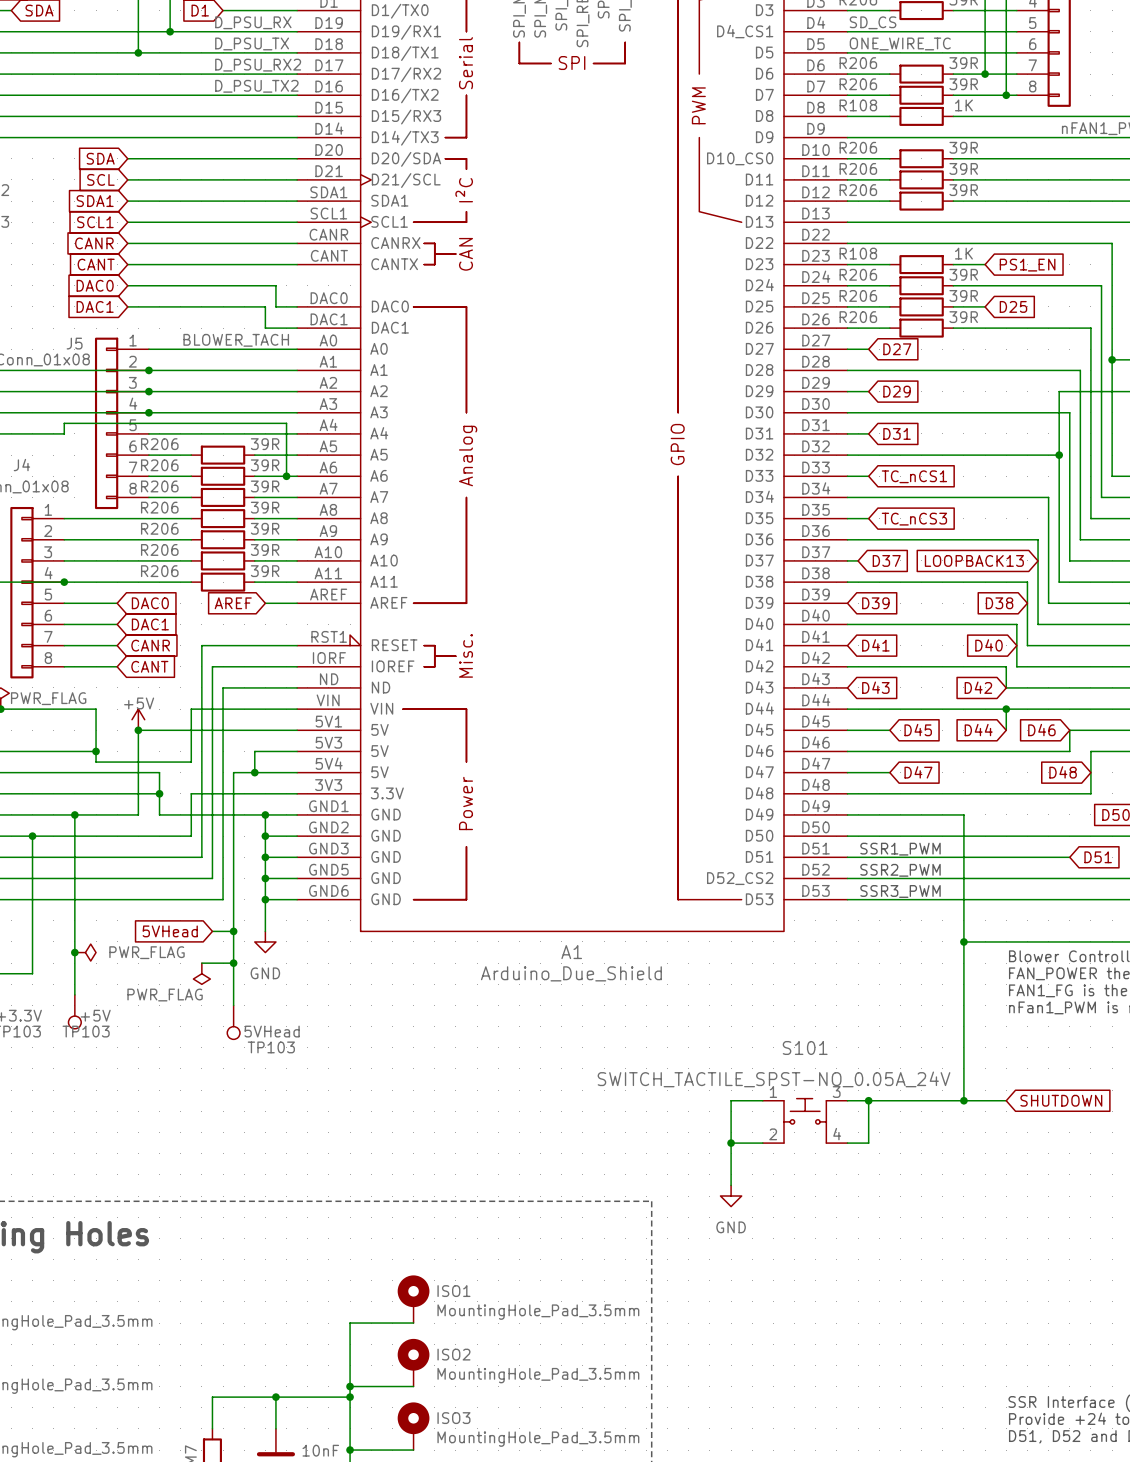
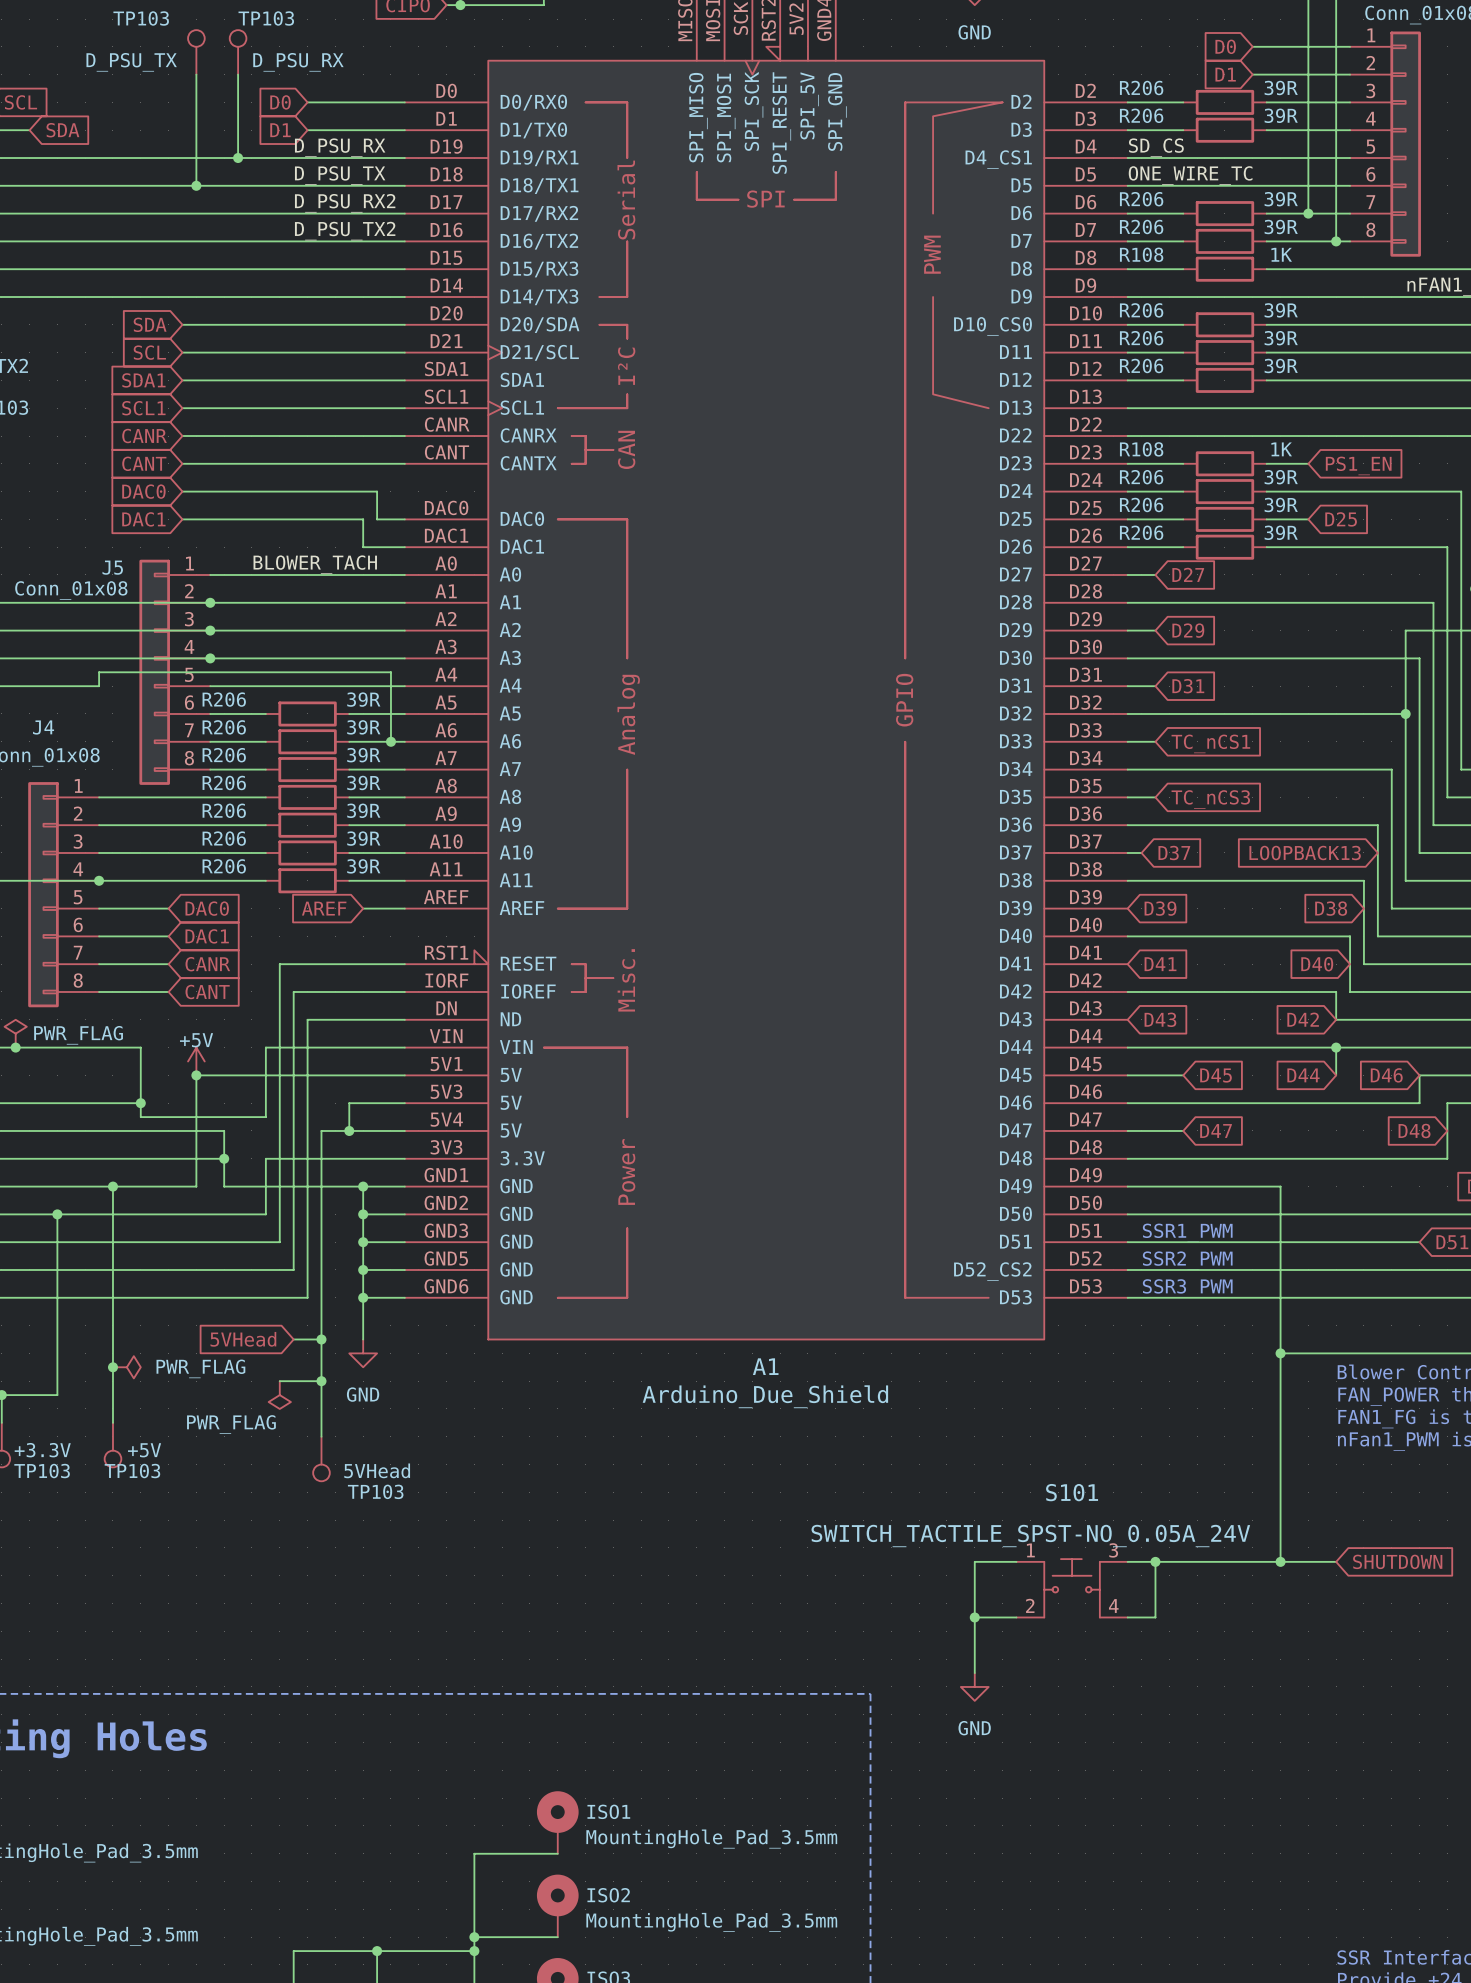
A1 pin number: ND (329, 679) -> DN (446, 1008)

